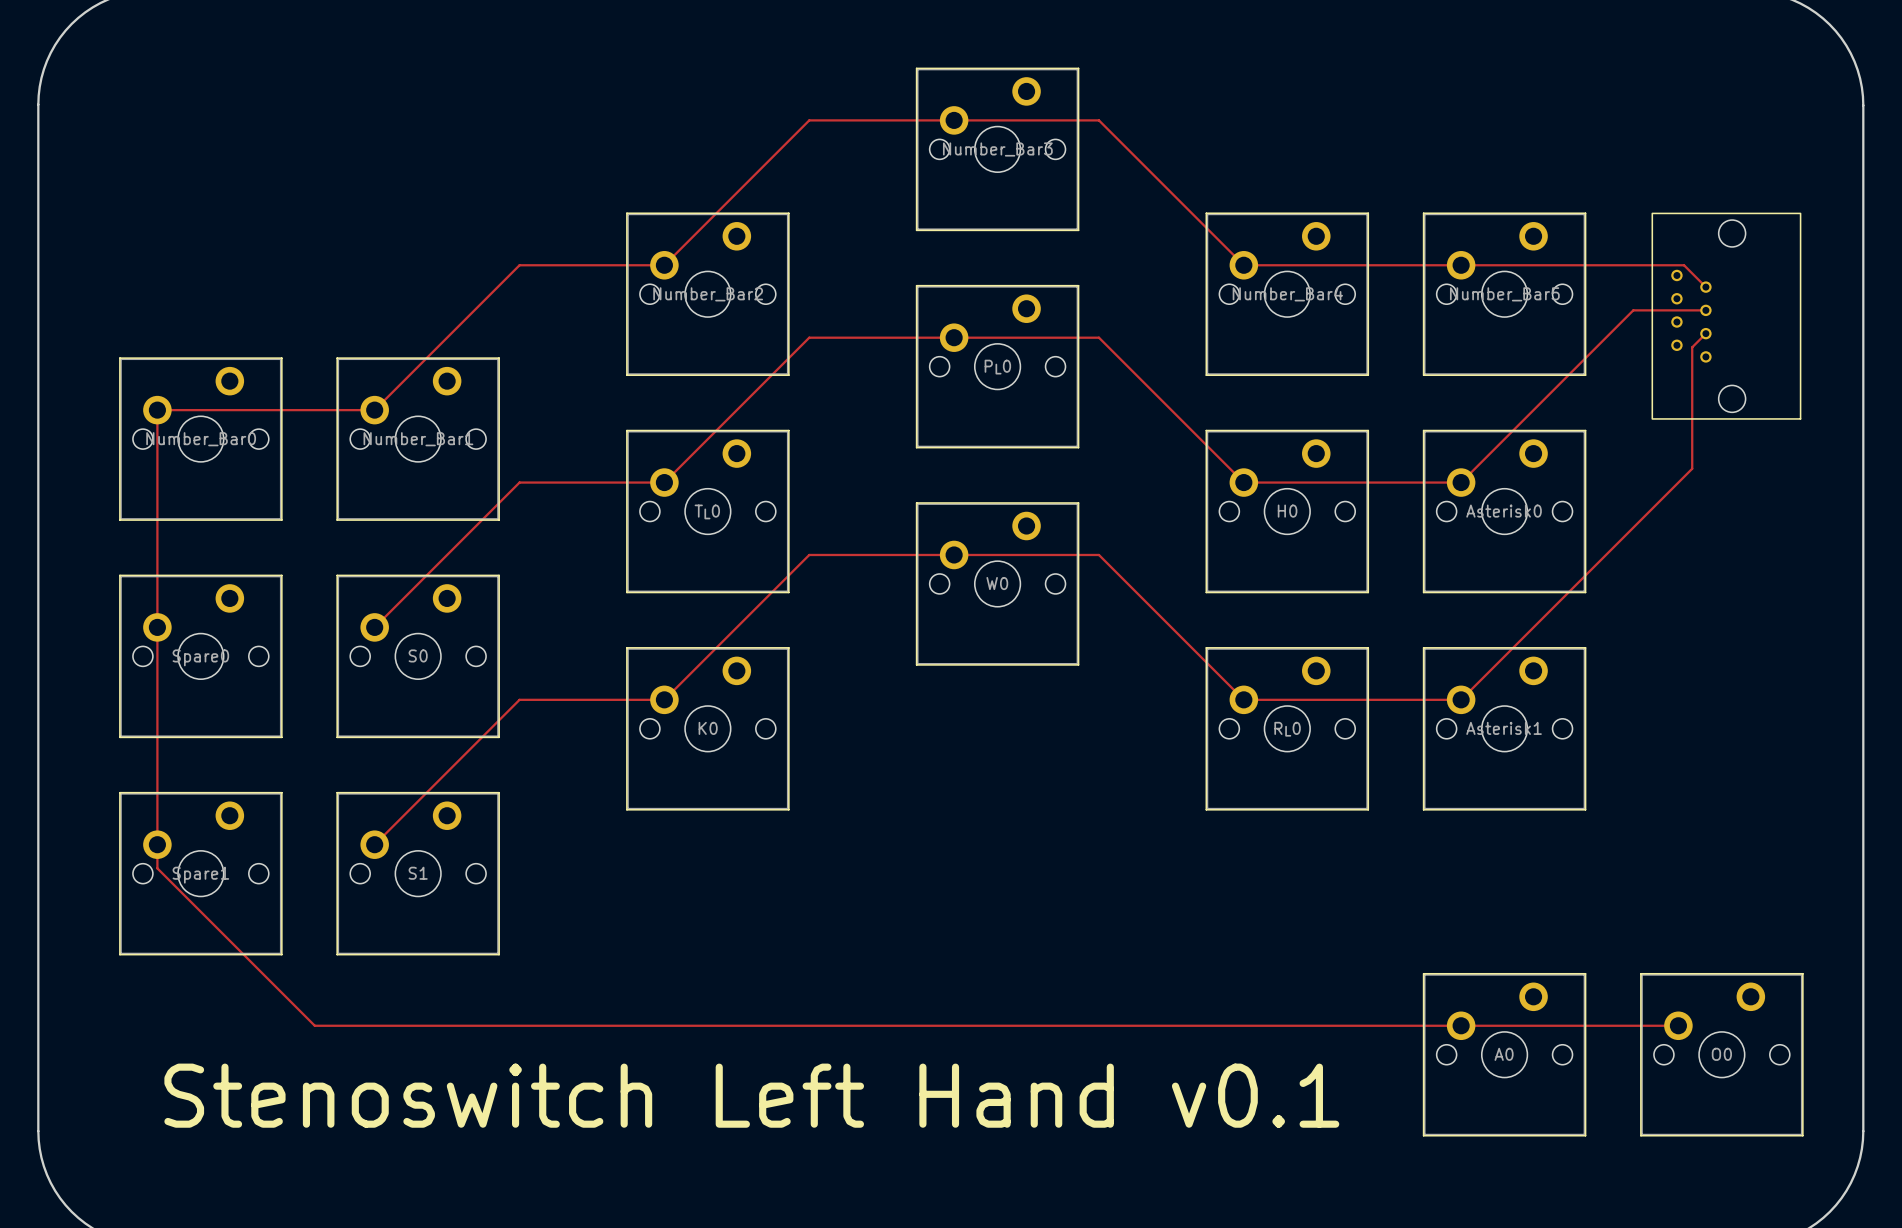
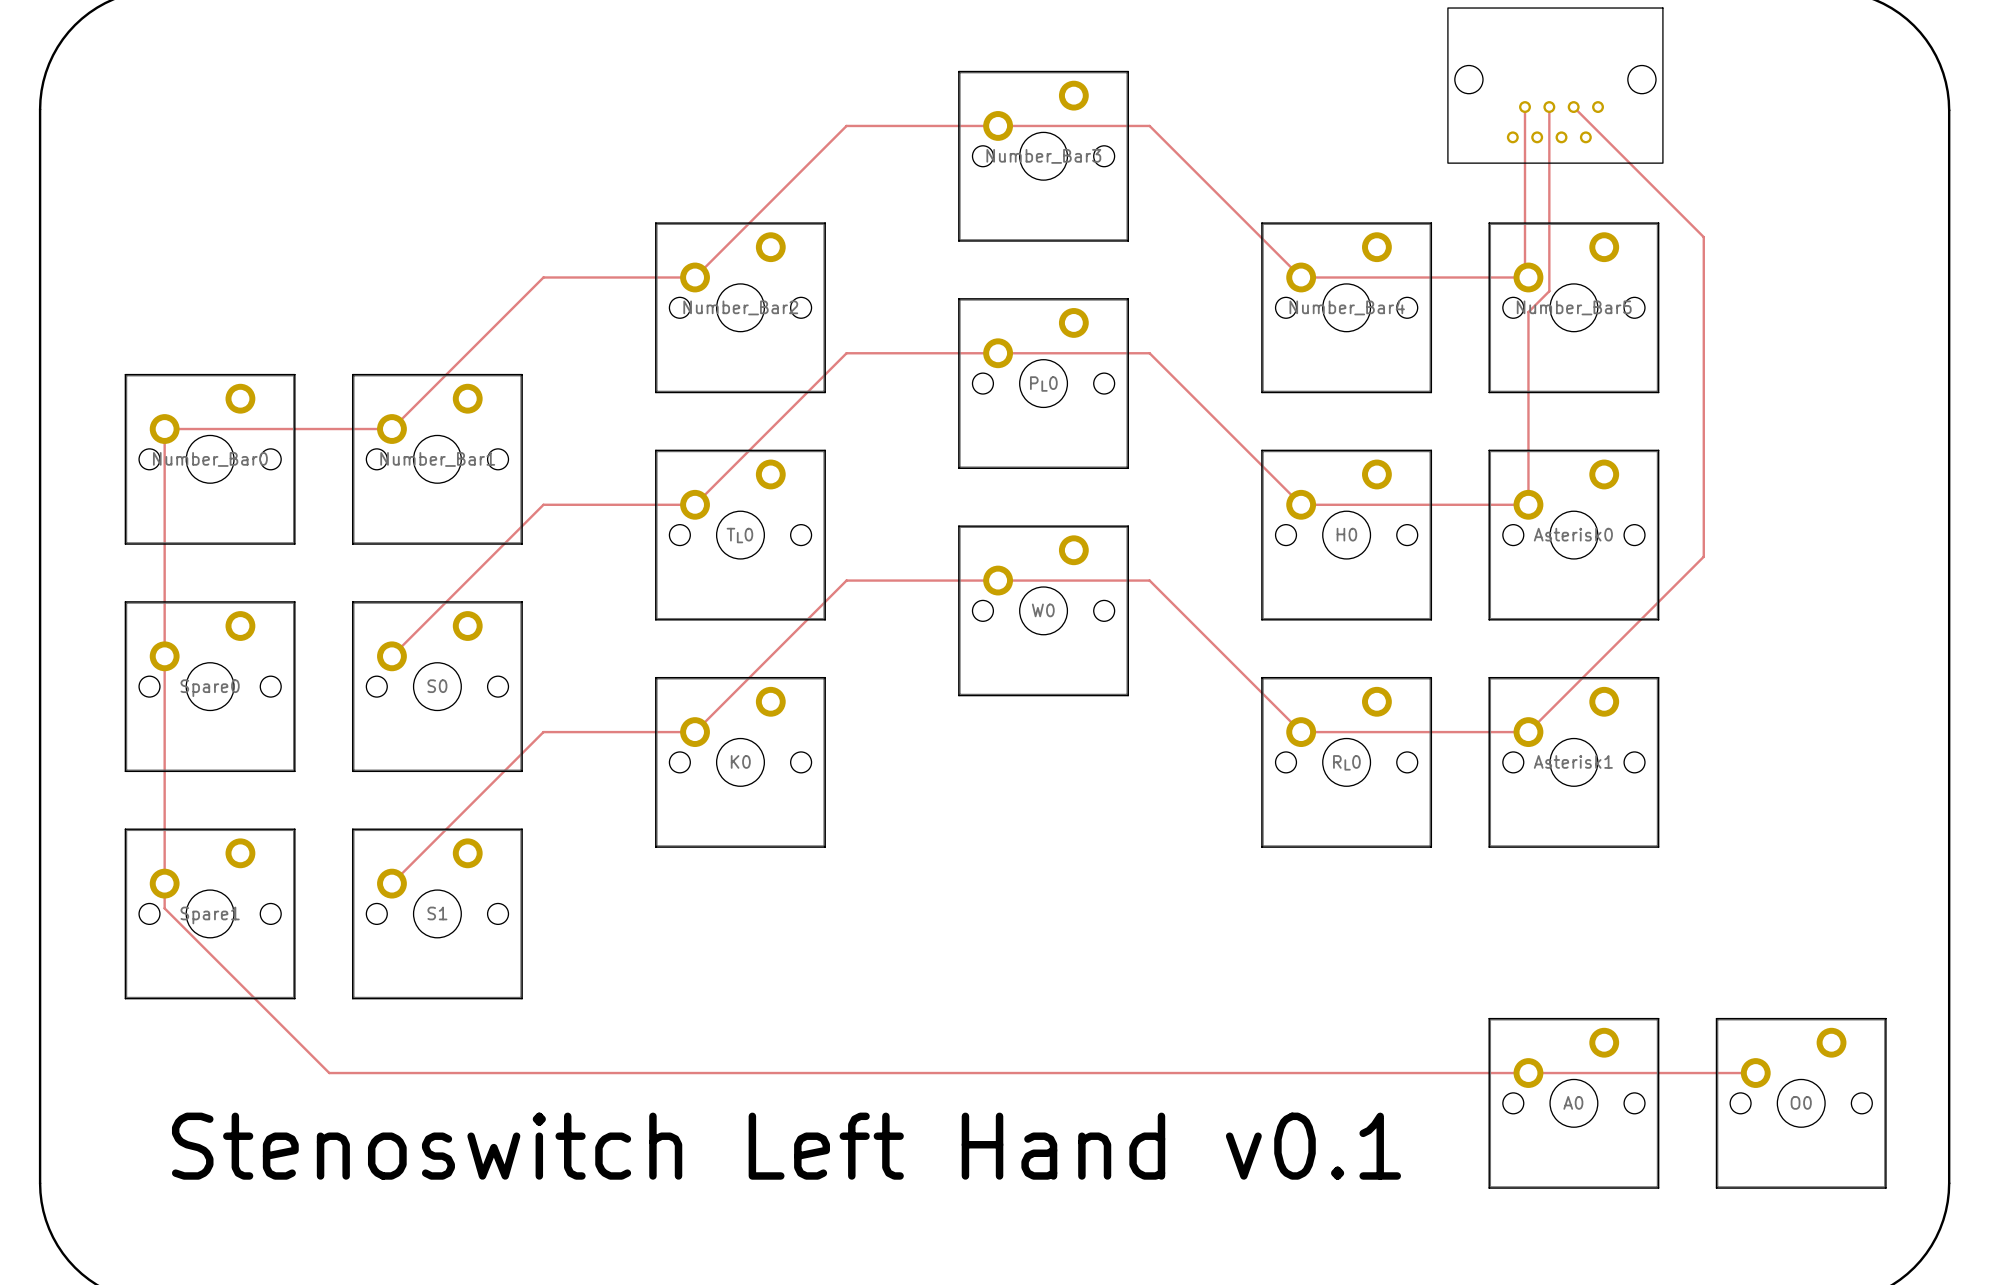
part: none -> (1555, 85)
track: (1461, 265) (1684, 265) (1705, 287) -> (1528, 277) (1525, 274) (1525, 107)
track: (1705, 310) (1633, 310) (1461, 482) -> (1549, 107) (1549, 291) (1528, 312) (1528, 504)
part: (1726, 316) -> none
track: (1705, 333) (1692, 347) (1692, 468) (1628, 532) -> (1573, 107) (1703, 237) (1703, 556)

